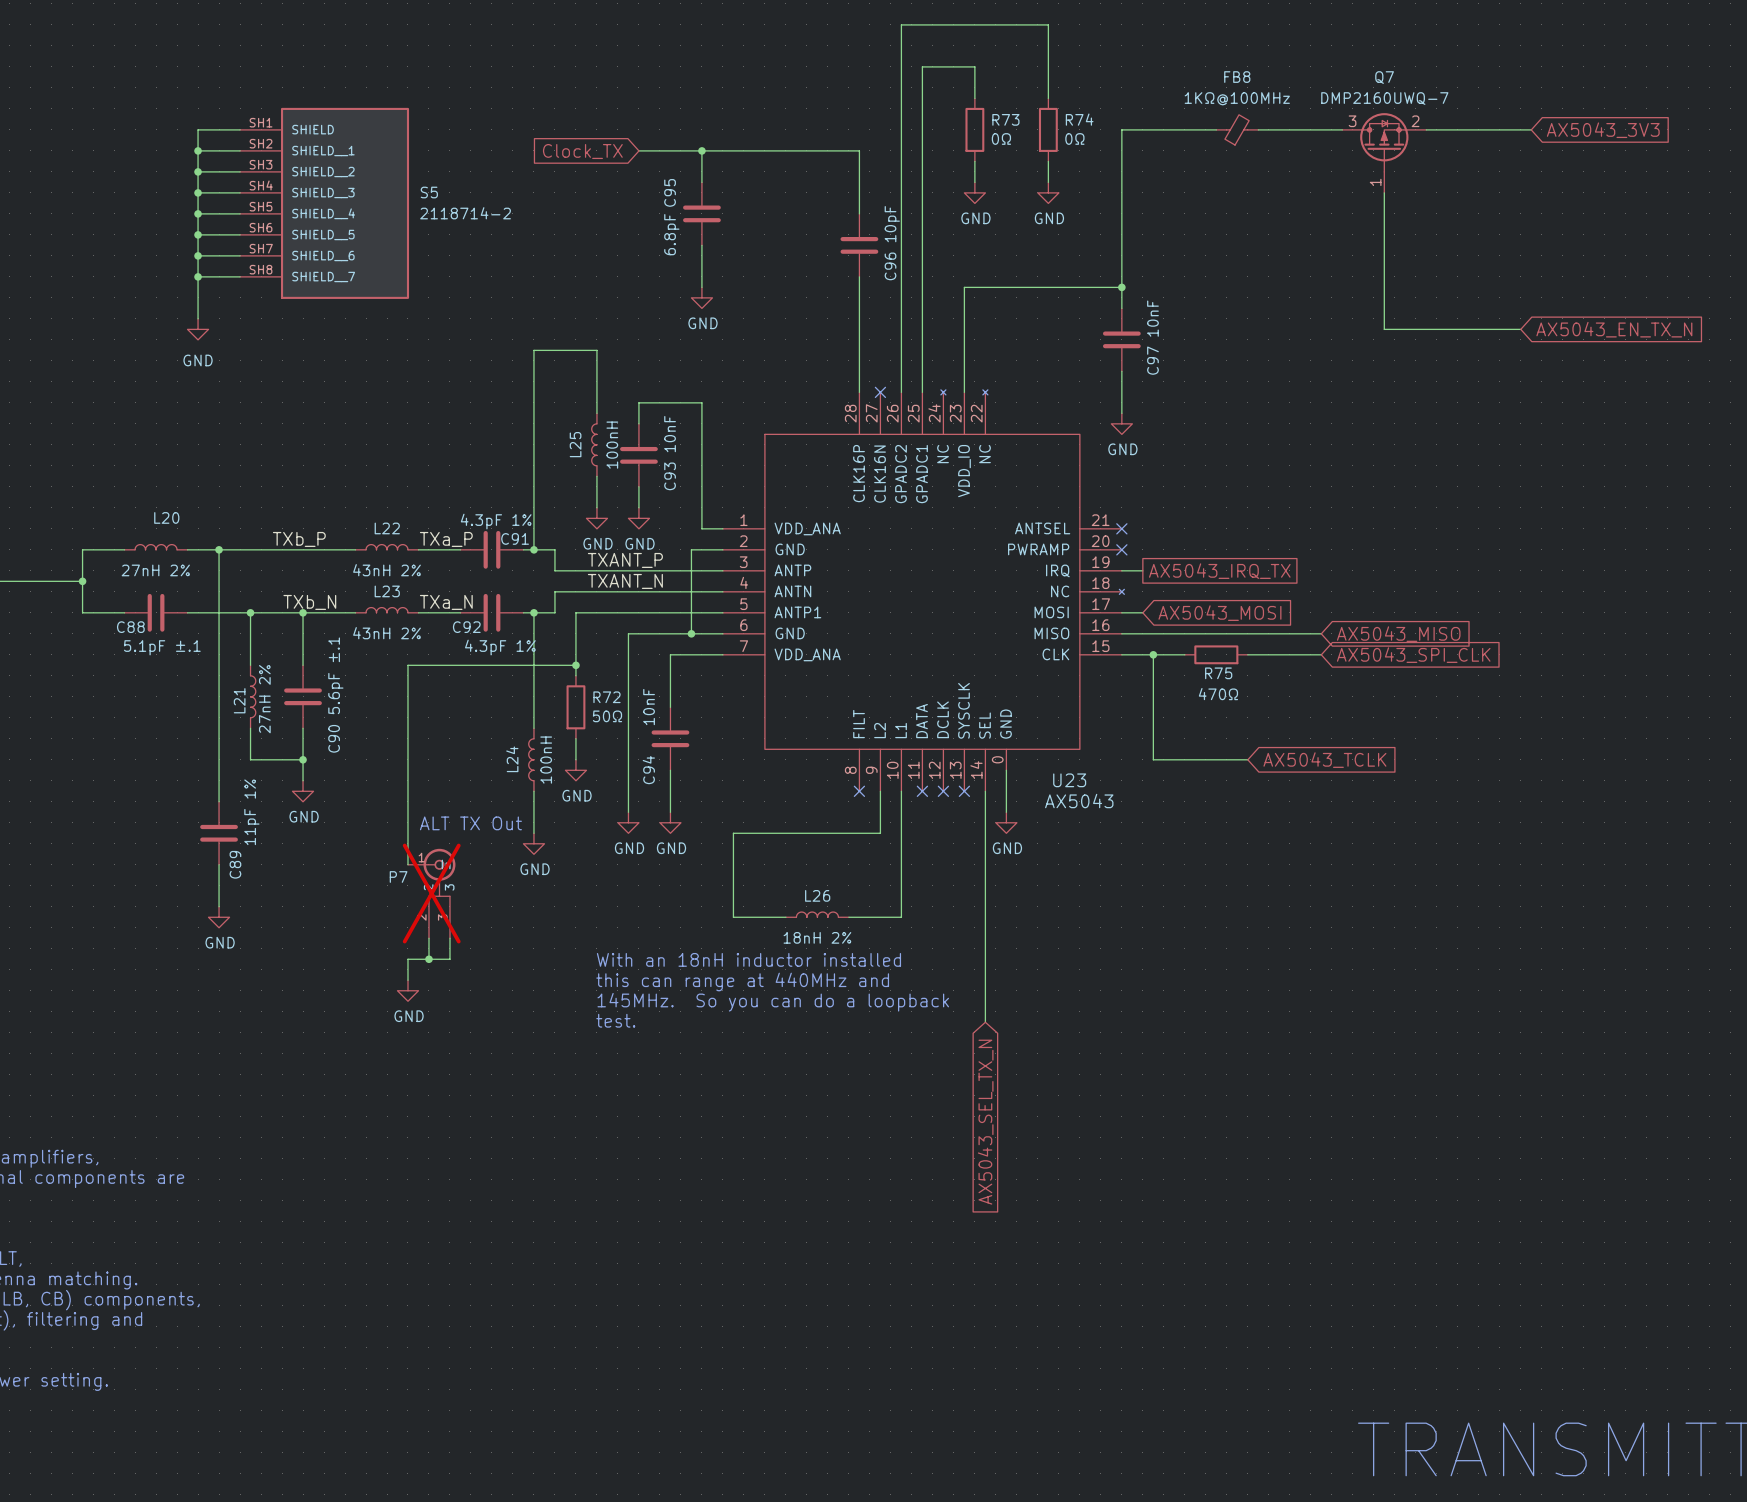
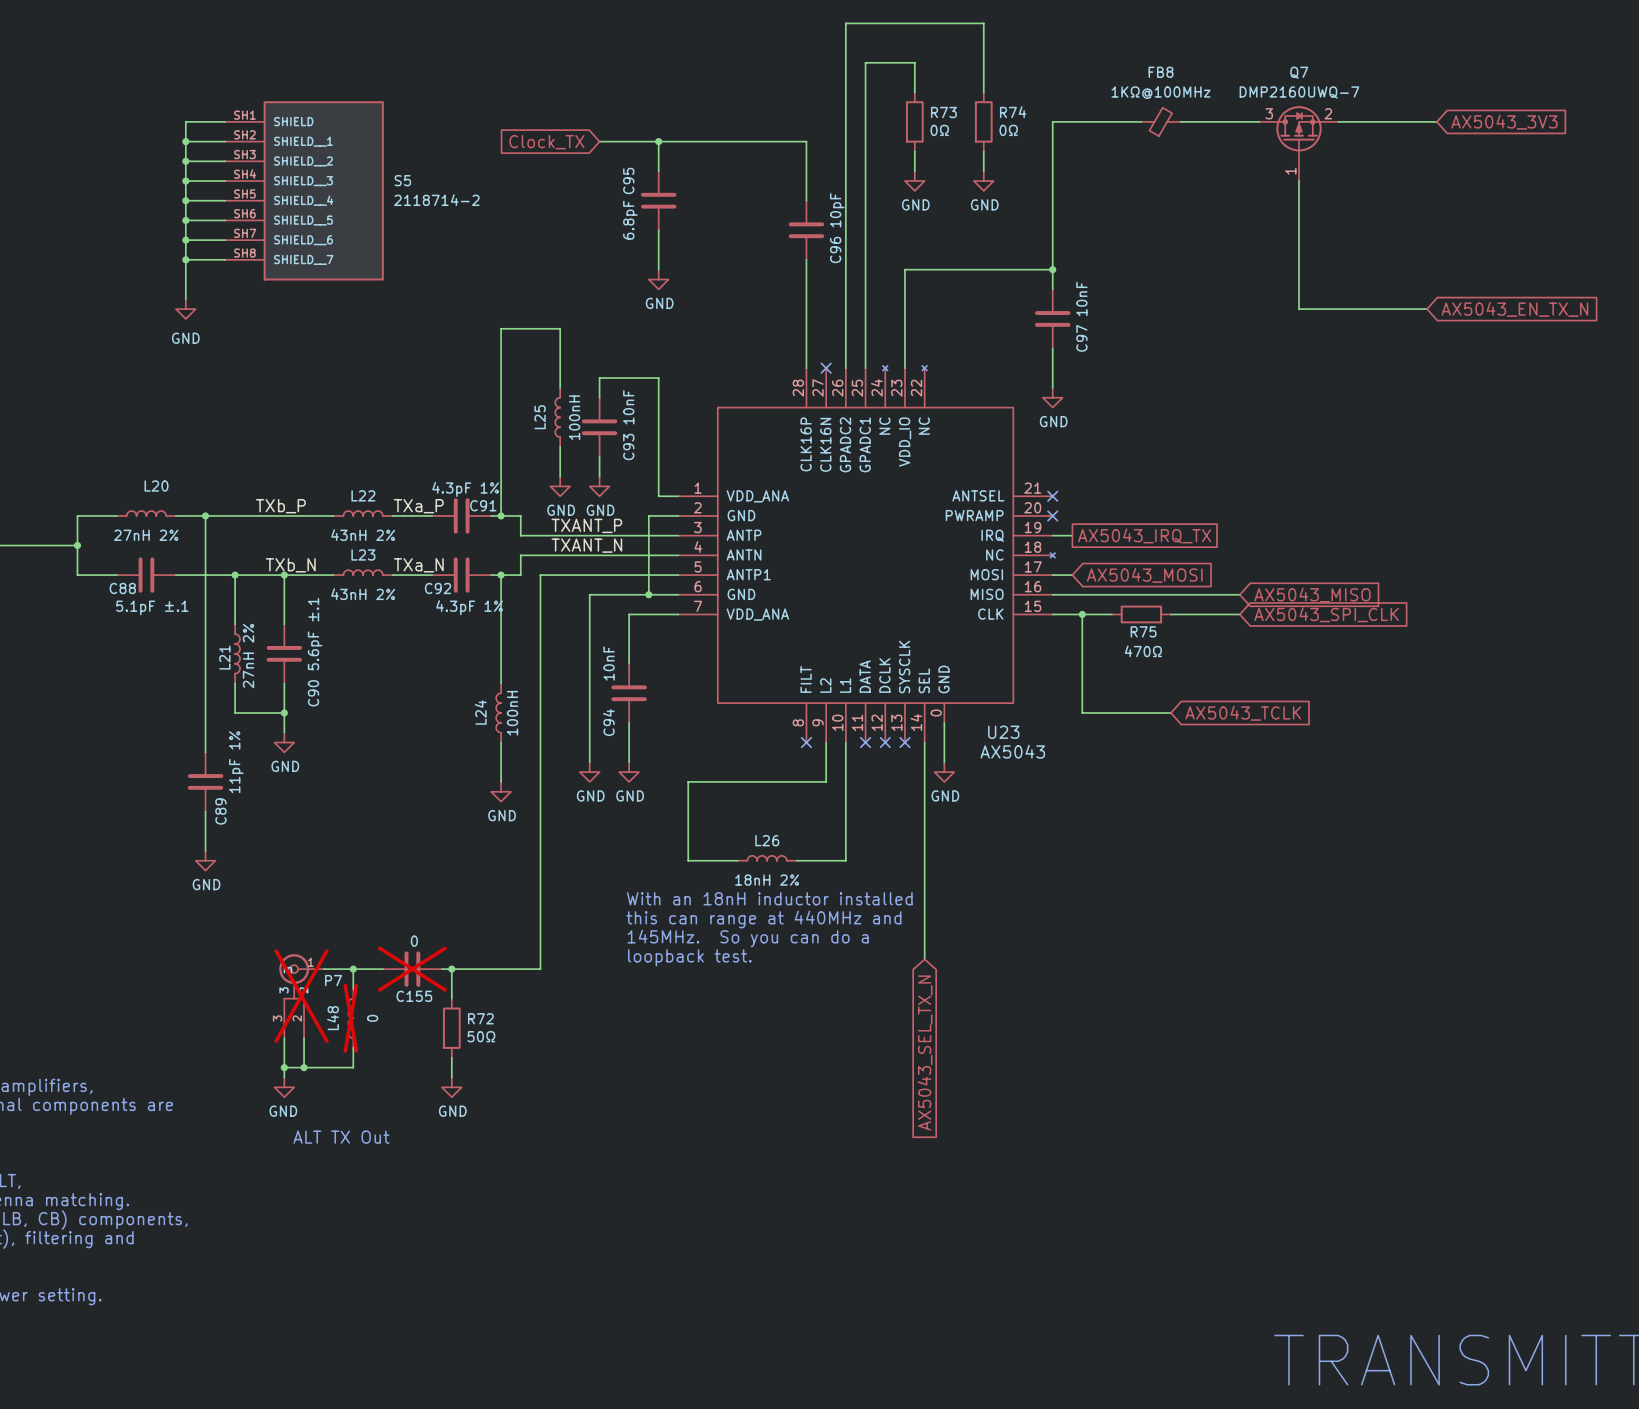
wire: (575, 665) (407, 665) (407, 864) -> none
junction: (575, 665) -> none
wire: none -> (540, 634) (540, 693)
R72 position: (575, 707) -> (451, 1028)
wire: none -> (540, 712) (540, 969) (441, 969)
power symbol: GND (575, 770) -> none
text: ALT TX Out (470, 823) -> none
P7 flip: as is (439, 872) -> left-right (294, 976)
P7 position: (431, 893) -> (301, 996)
wire: (428, 938) (428, 959) -> (353, 969) (353, 988)
wire: (449, 938) (449, 959) (407, 959) (407, 980) -> none
junction: (428, 959) -> none
text position: With an 18nH inductor installed (748, 959) -> With an 18nH inductor installed (769, 898)
text position: this can range at 440MHz and (742, 981) -> this can range at 440MHz and (763, 919)
power symbol: GND (407, 990) -> none
text: 145MHz. So you can do a loopback (773, 1002) -> 145MHz. So you can do a (748, 938)
text: test. (615, 1020) -> none
text: none -> loopback test. (689, 957)
wire: none -> (323, 969) (382, 969)
junction: none -> (353, 969)
C155: none -> 0 (412, 969)
wire: none -> (451, 969) (451, 998)
junction: none -> (451, 969)
L48: none -> 0 (350, 1018)
wire: none -> (284, 1038) (284, 1077)
wire: none -> (304, 1038) (304, 1067)
wire: none -> (353, 1047) (353, 1067) (284, 1067)
wire: none -> (451, 1057) (451, 1077)
junction: none -> (284, 1067)
junction: none -> (304, 1067)
power symbol: none -> GND (284, 1087)
power symbol: none -> GND (451, 1087)
text: none -> ALT TX Out (341, 1137)

